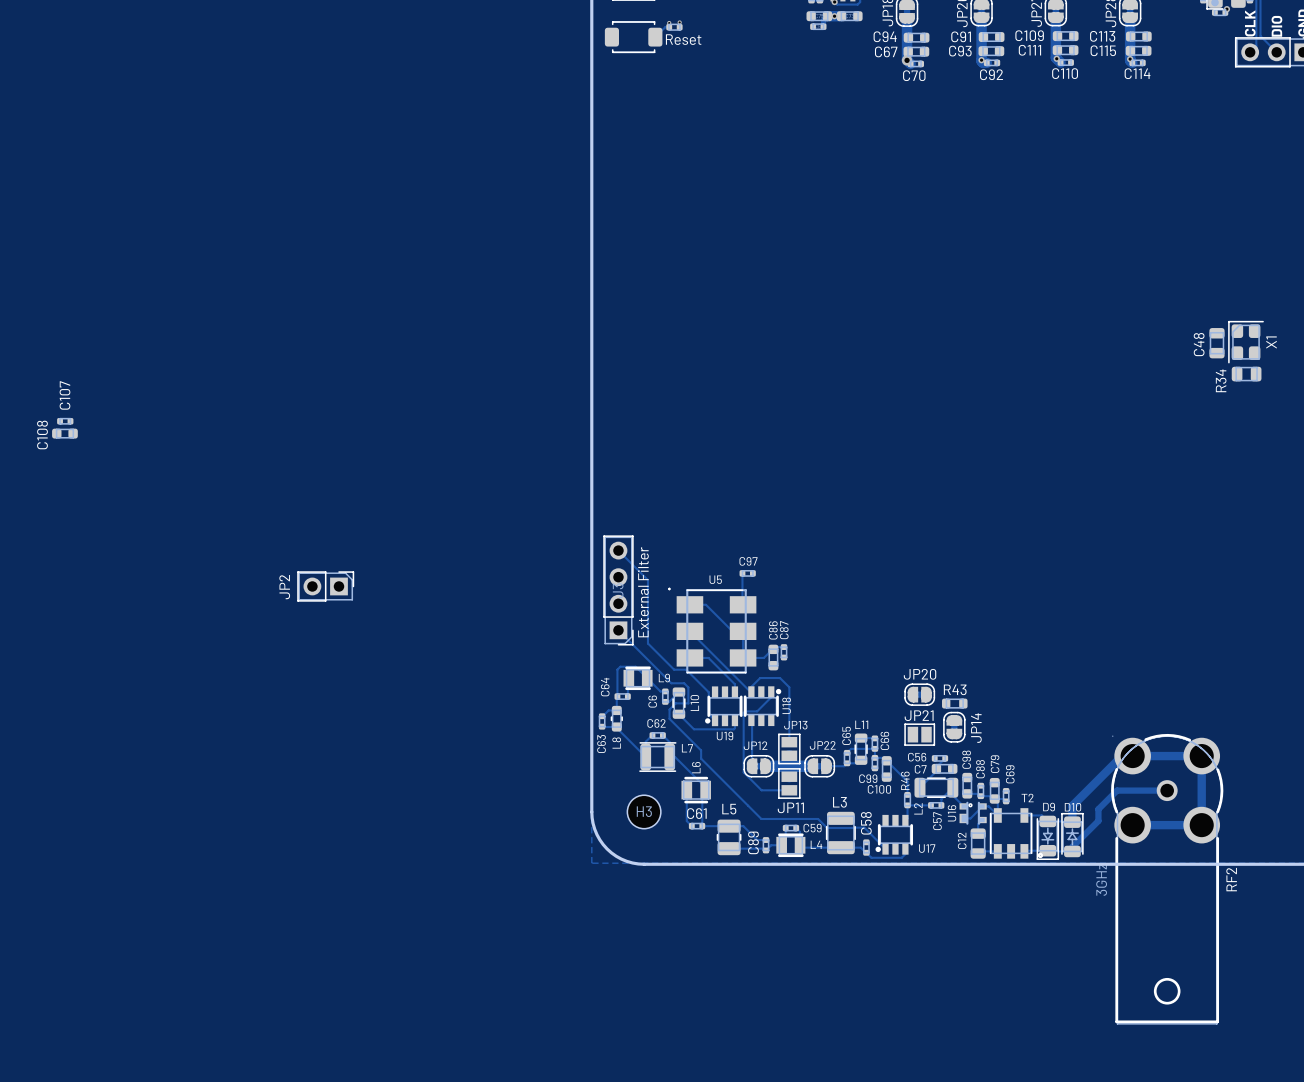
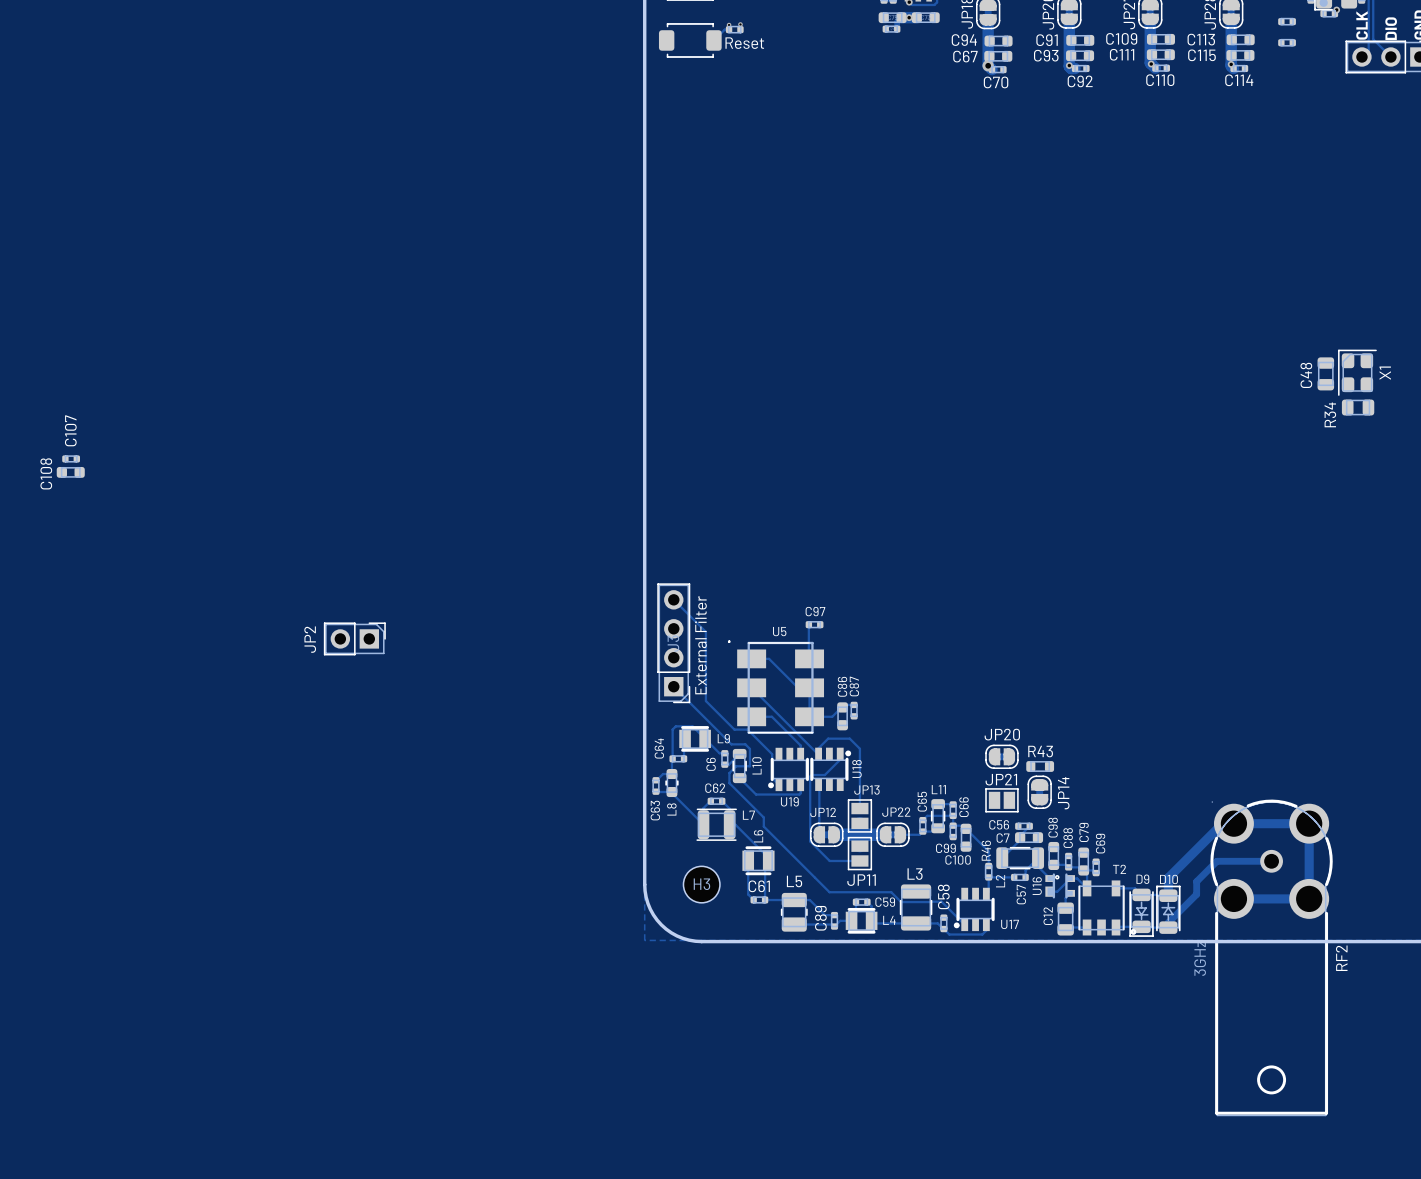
part: none -> (1287, 21)
part: none -> (1287, 42)

